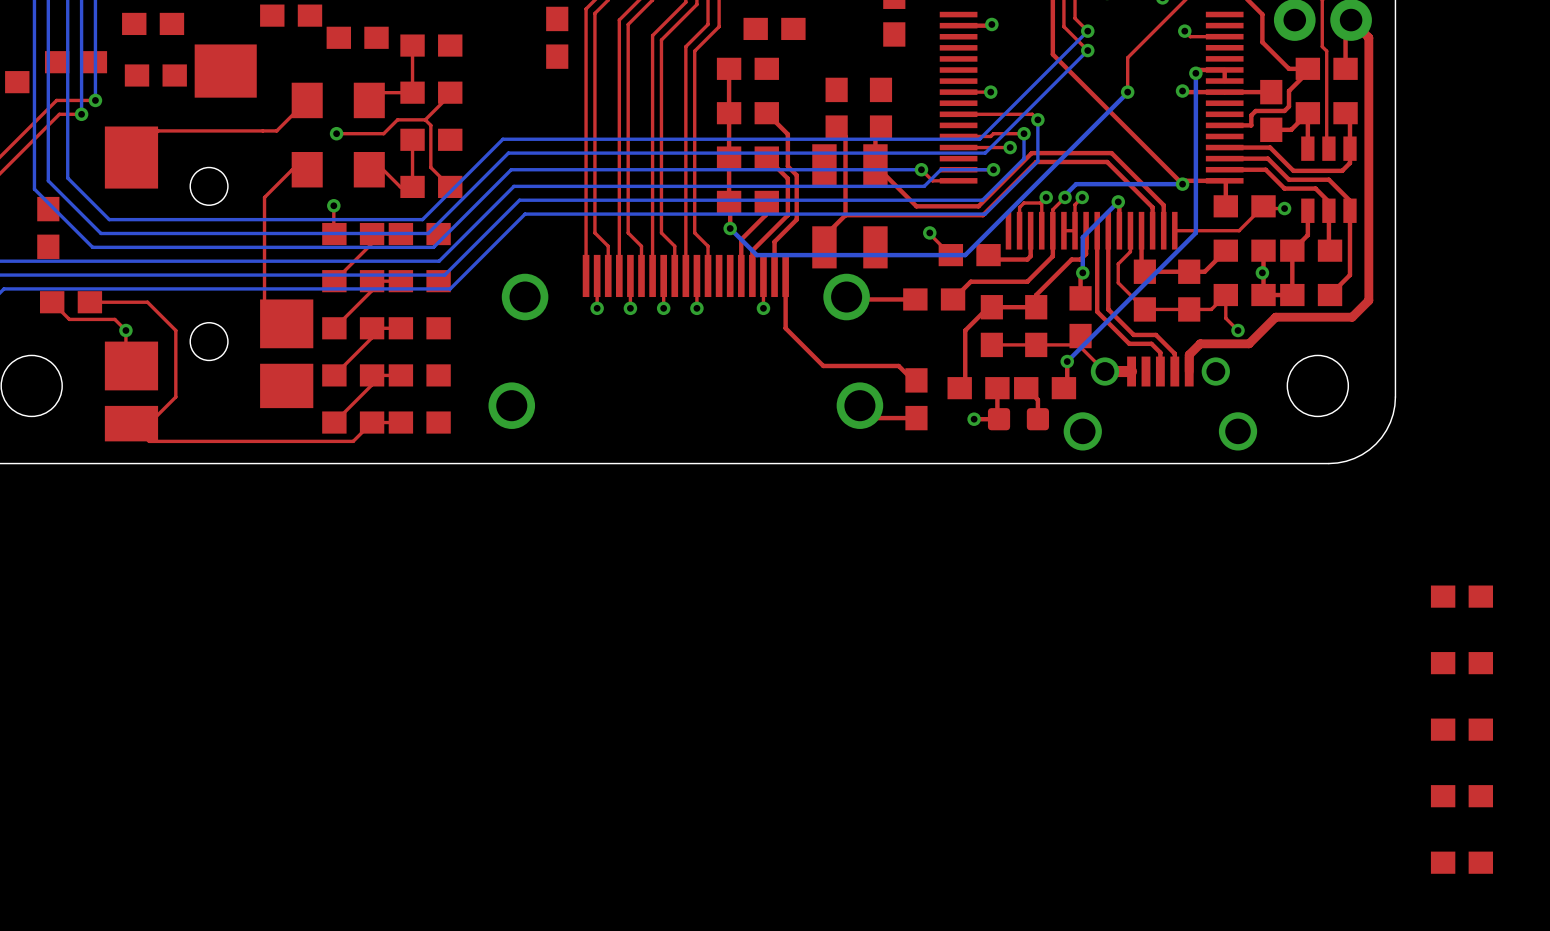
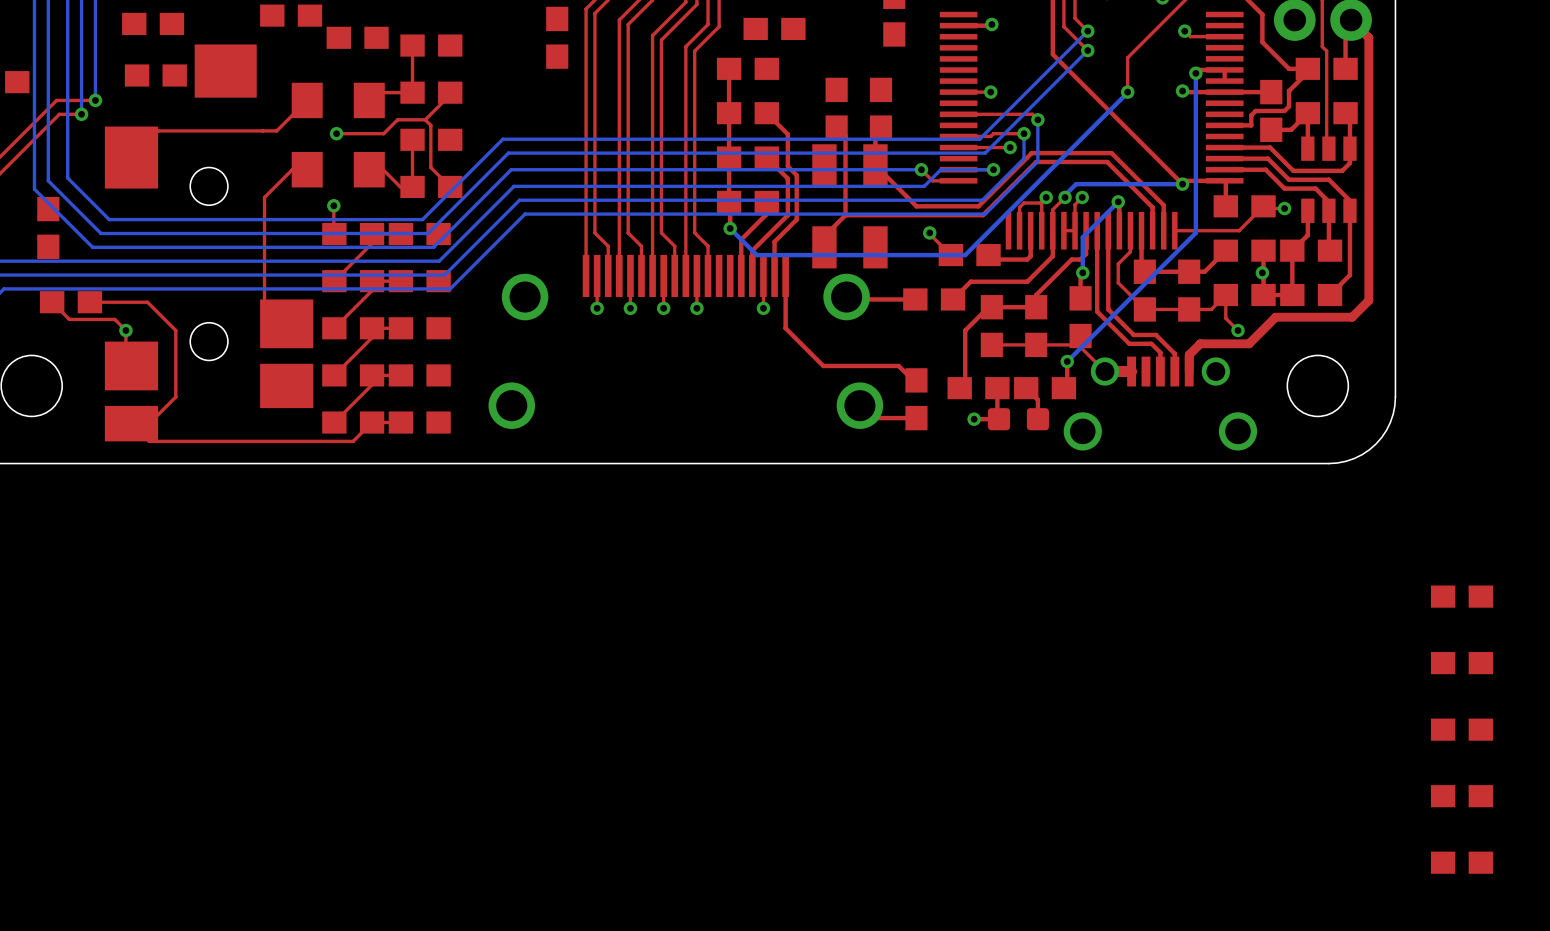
part: (76, 62) -> none

